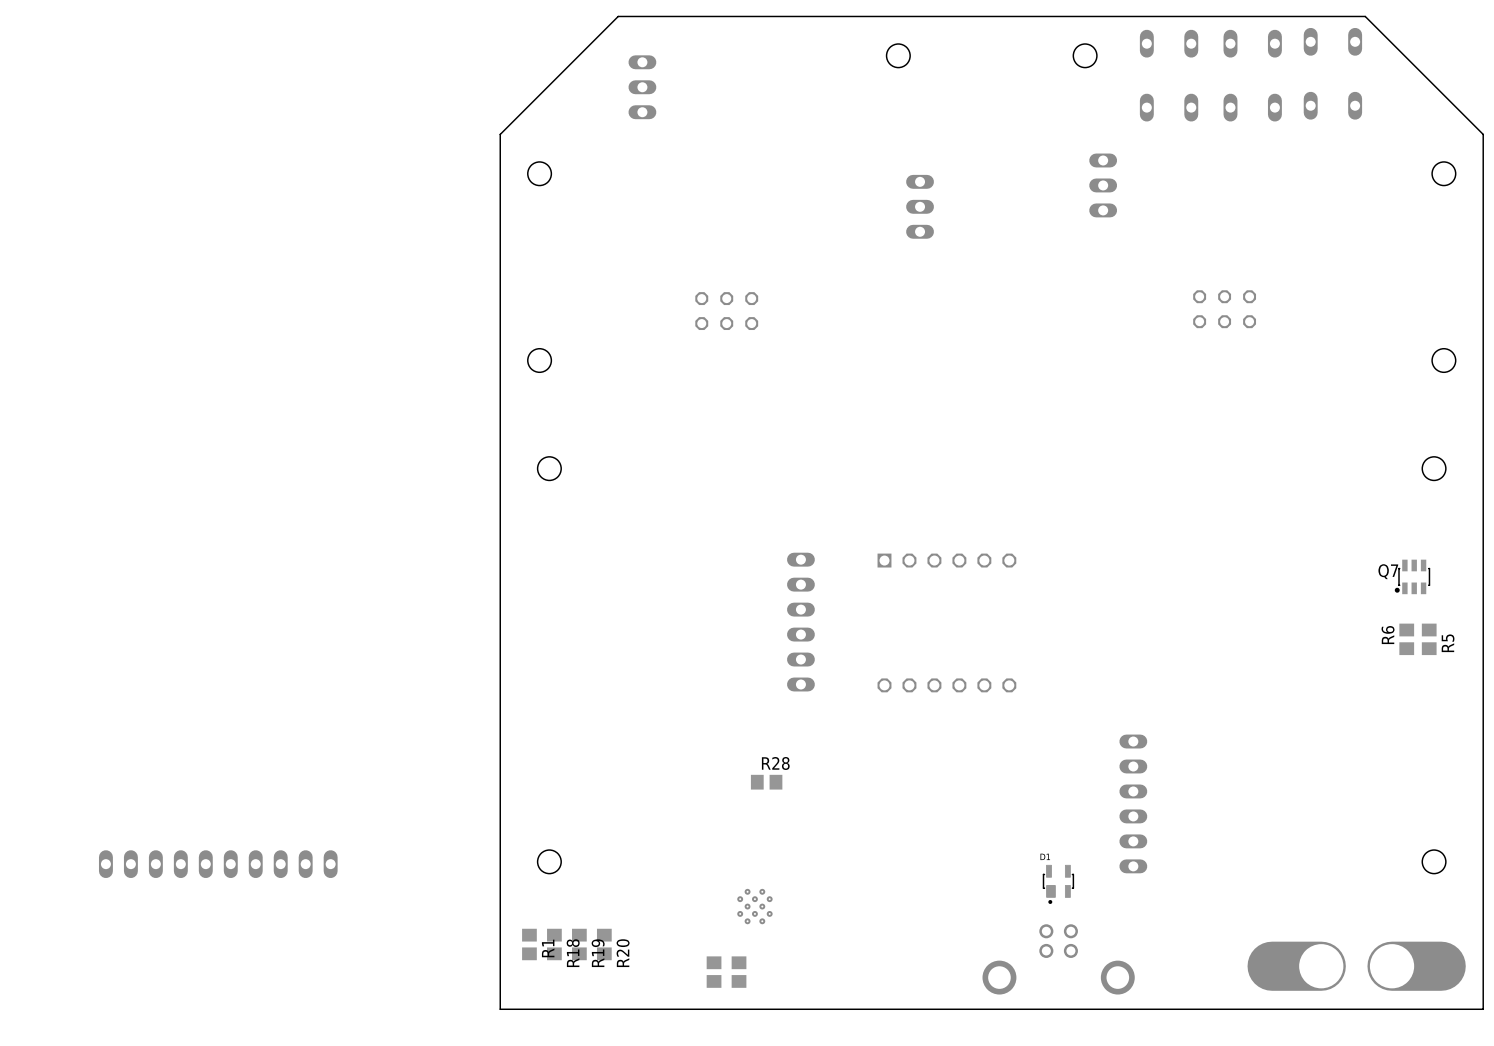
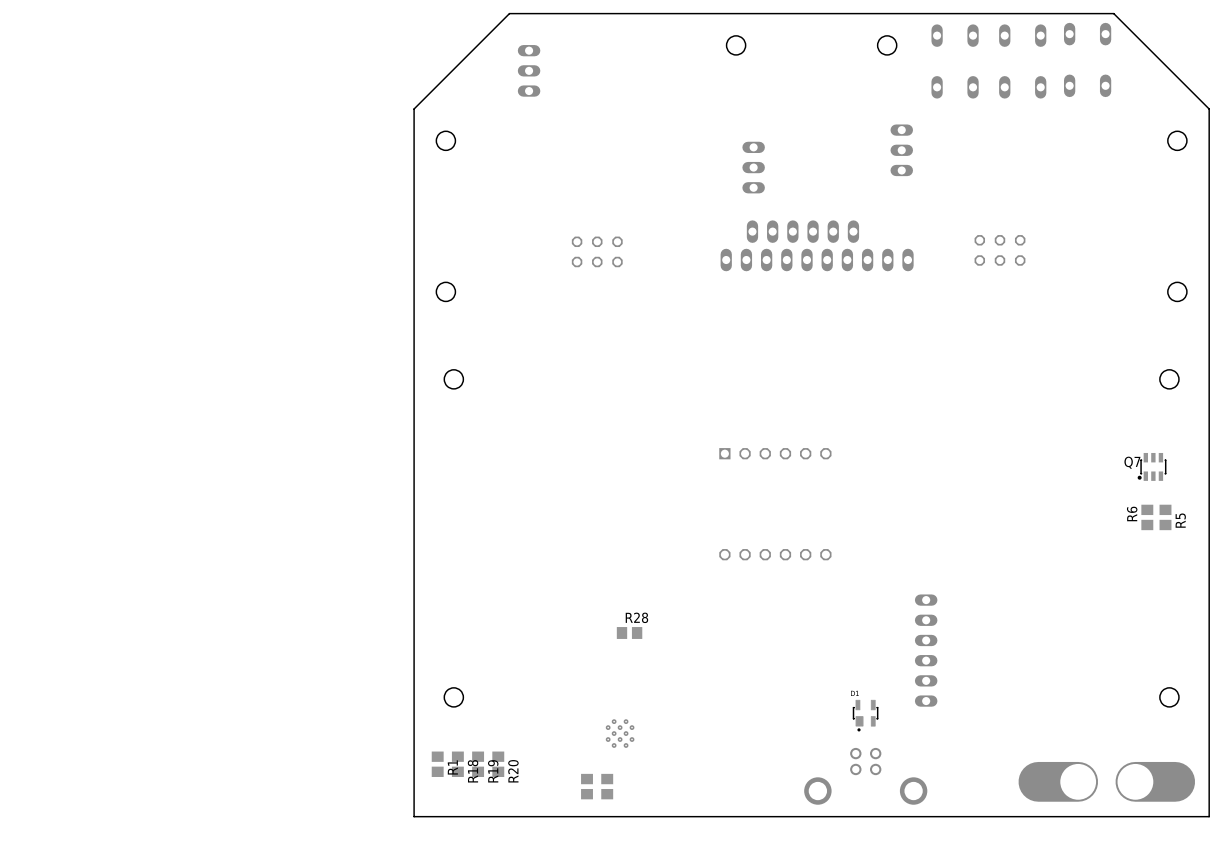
part: none -> (802, 231)
part: none -> (817, 260)
part: (800, 622) -> none
part: (218, 864) -> none

